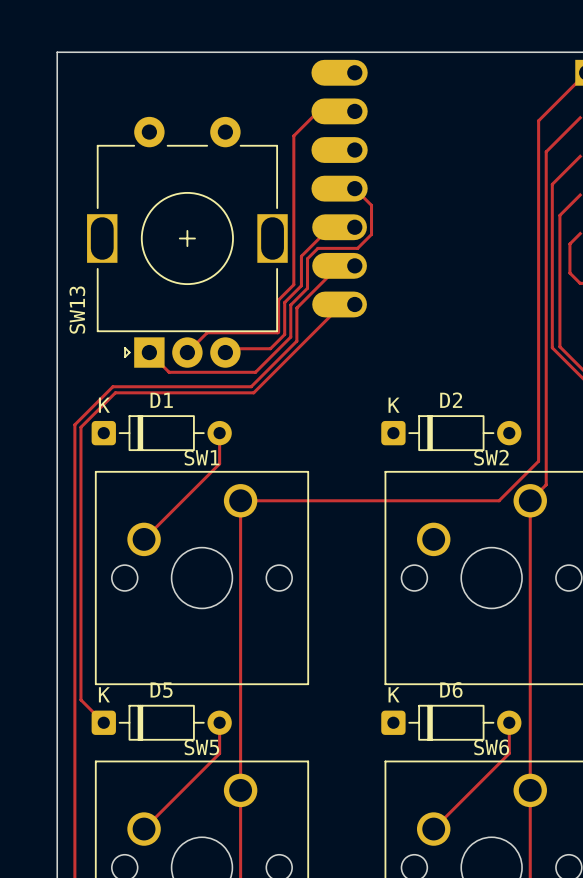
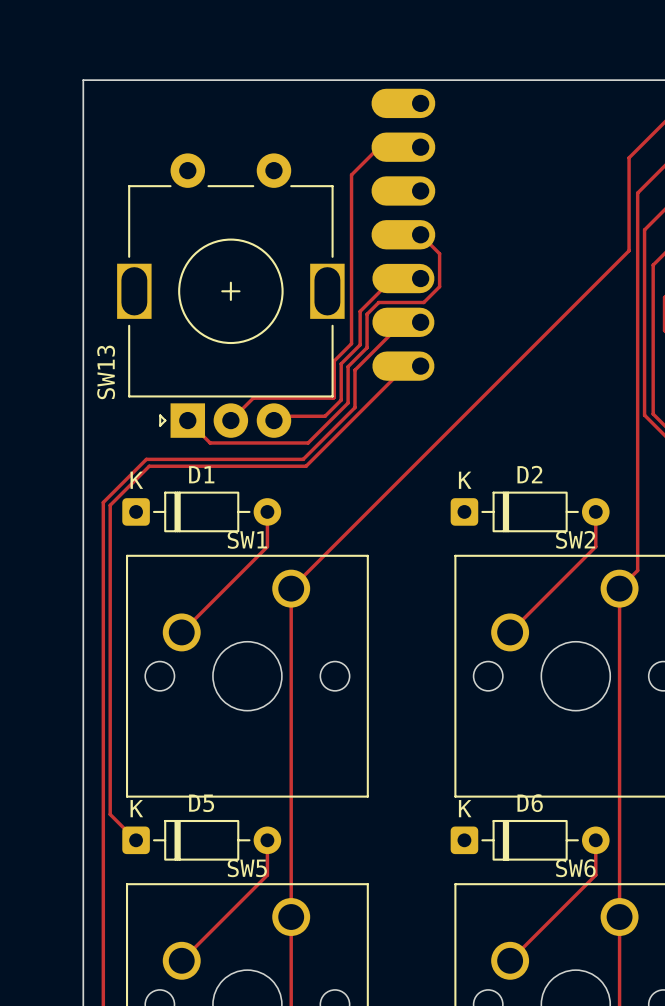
track: (538, 202) (538, 461) (499, 500) (241, 500) -> (629, 250) (291, 588)
track: none -> (595, 511) (595, 546) (510, 632)

